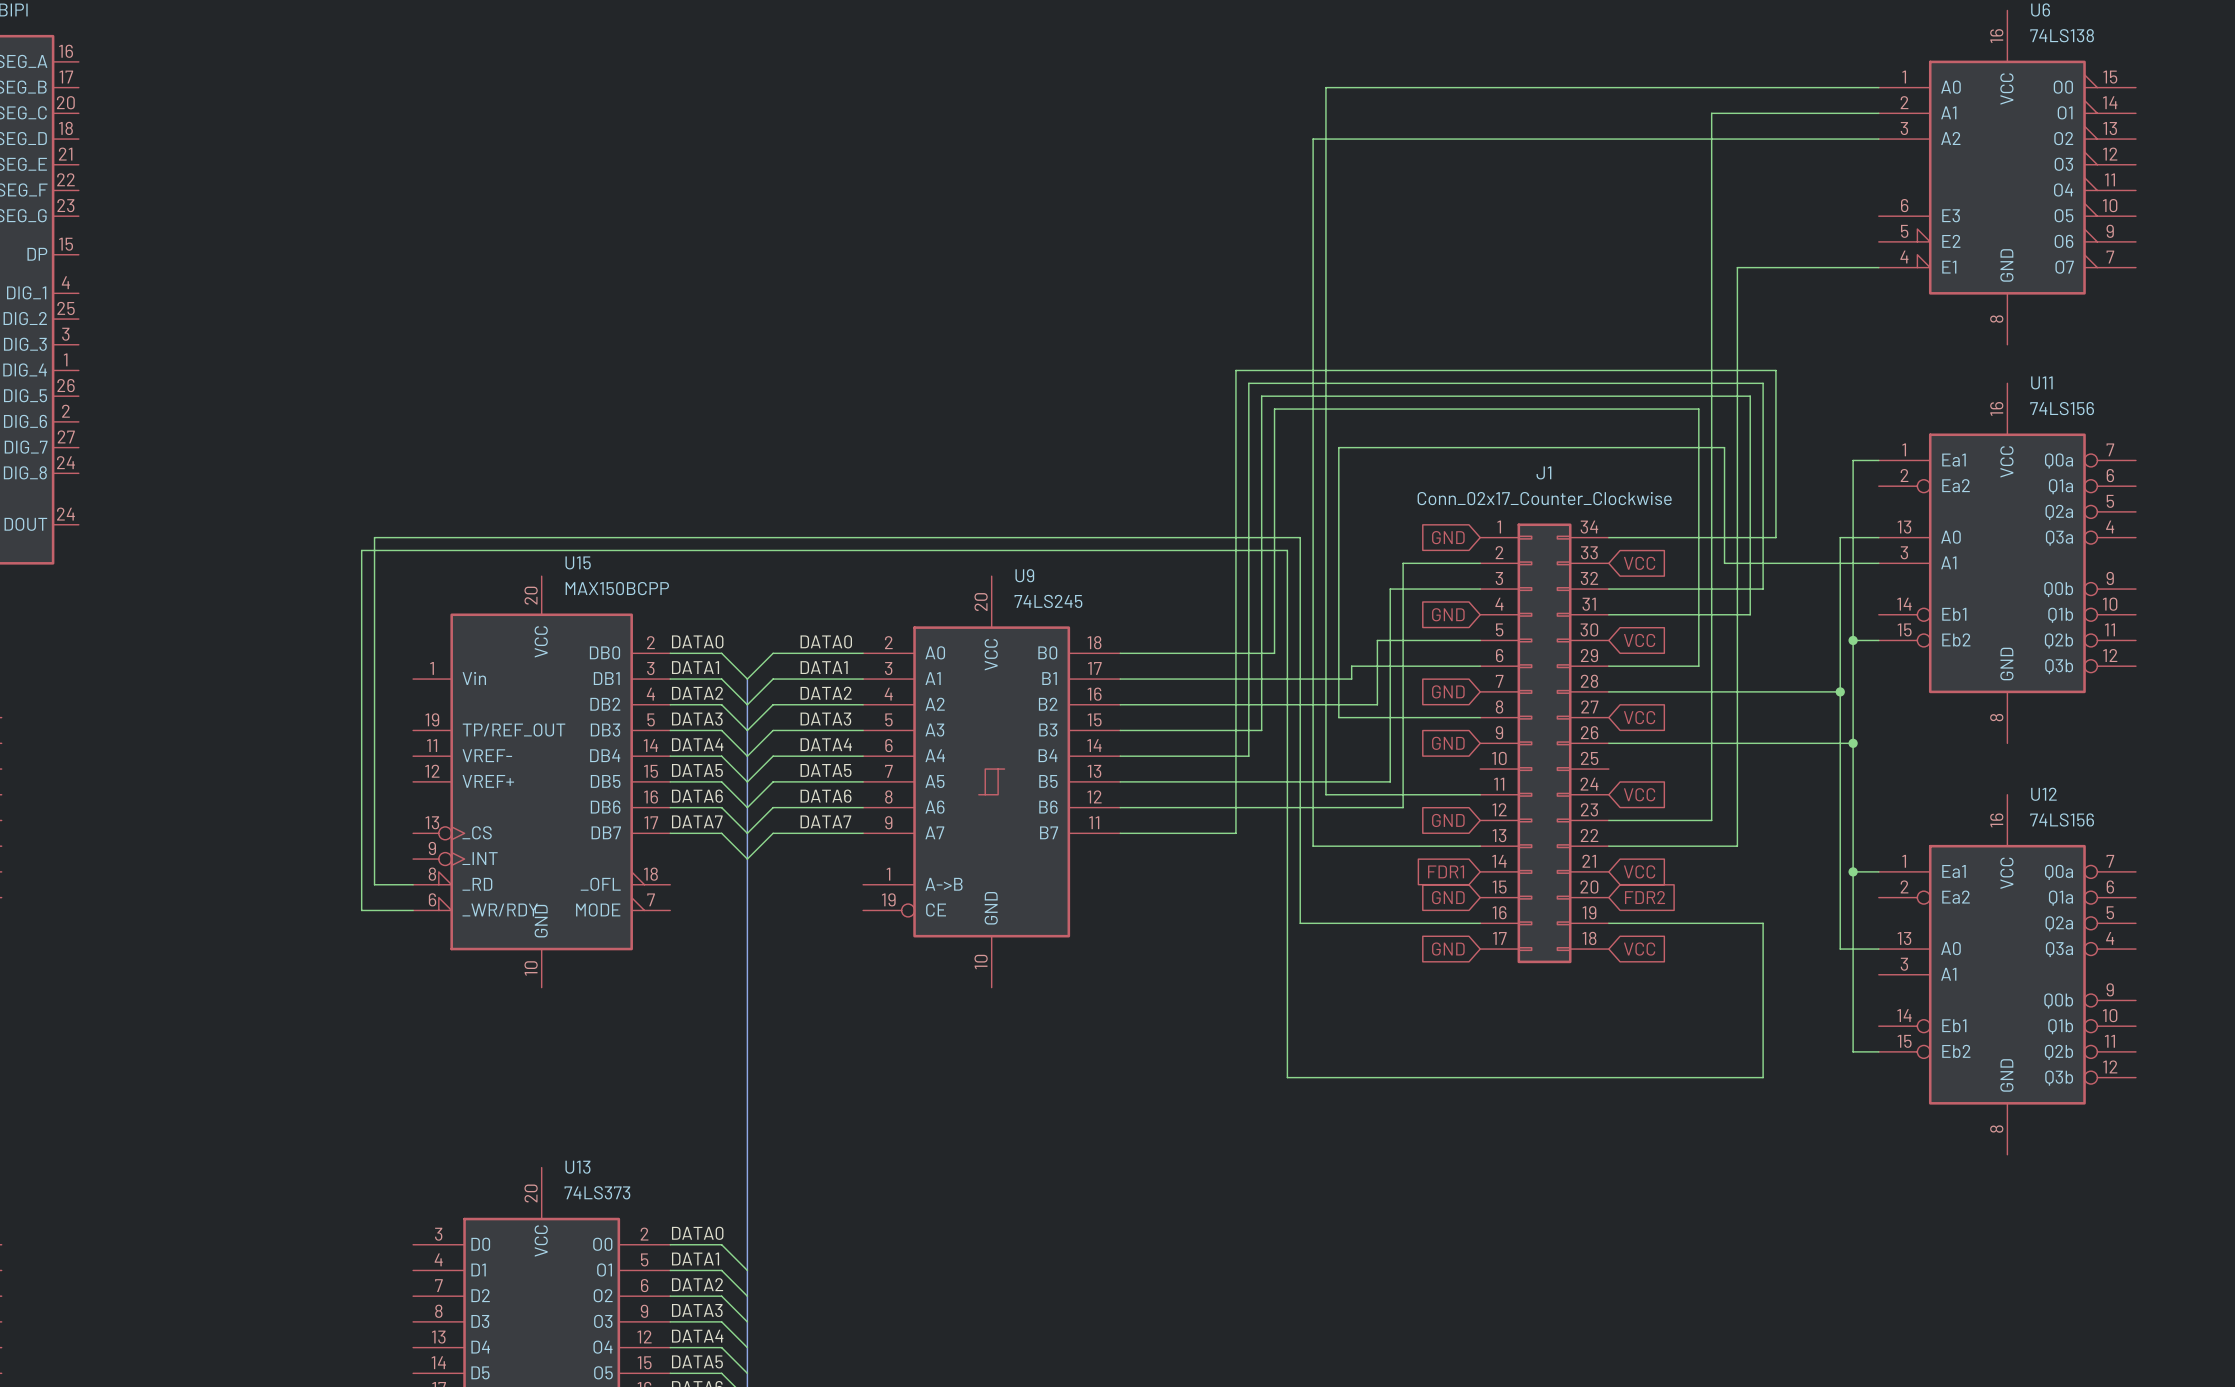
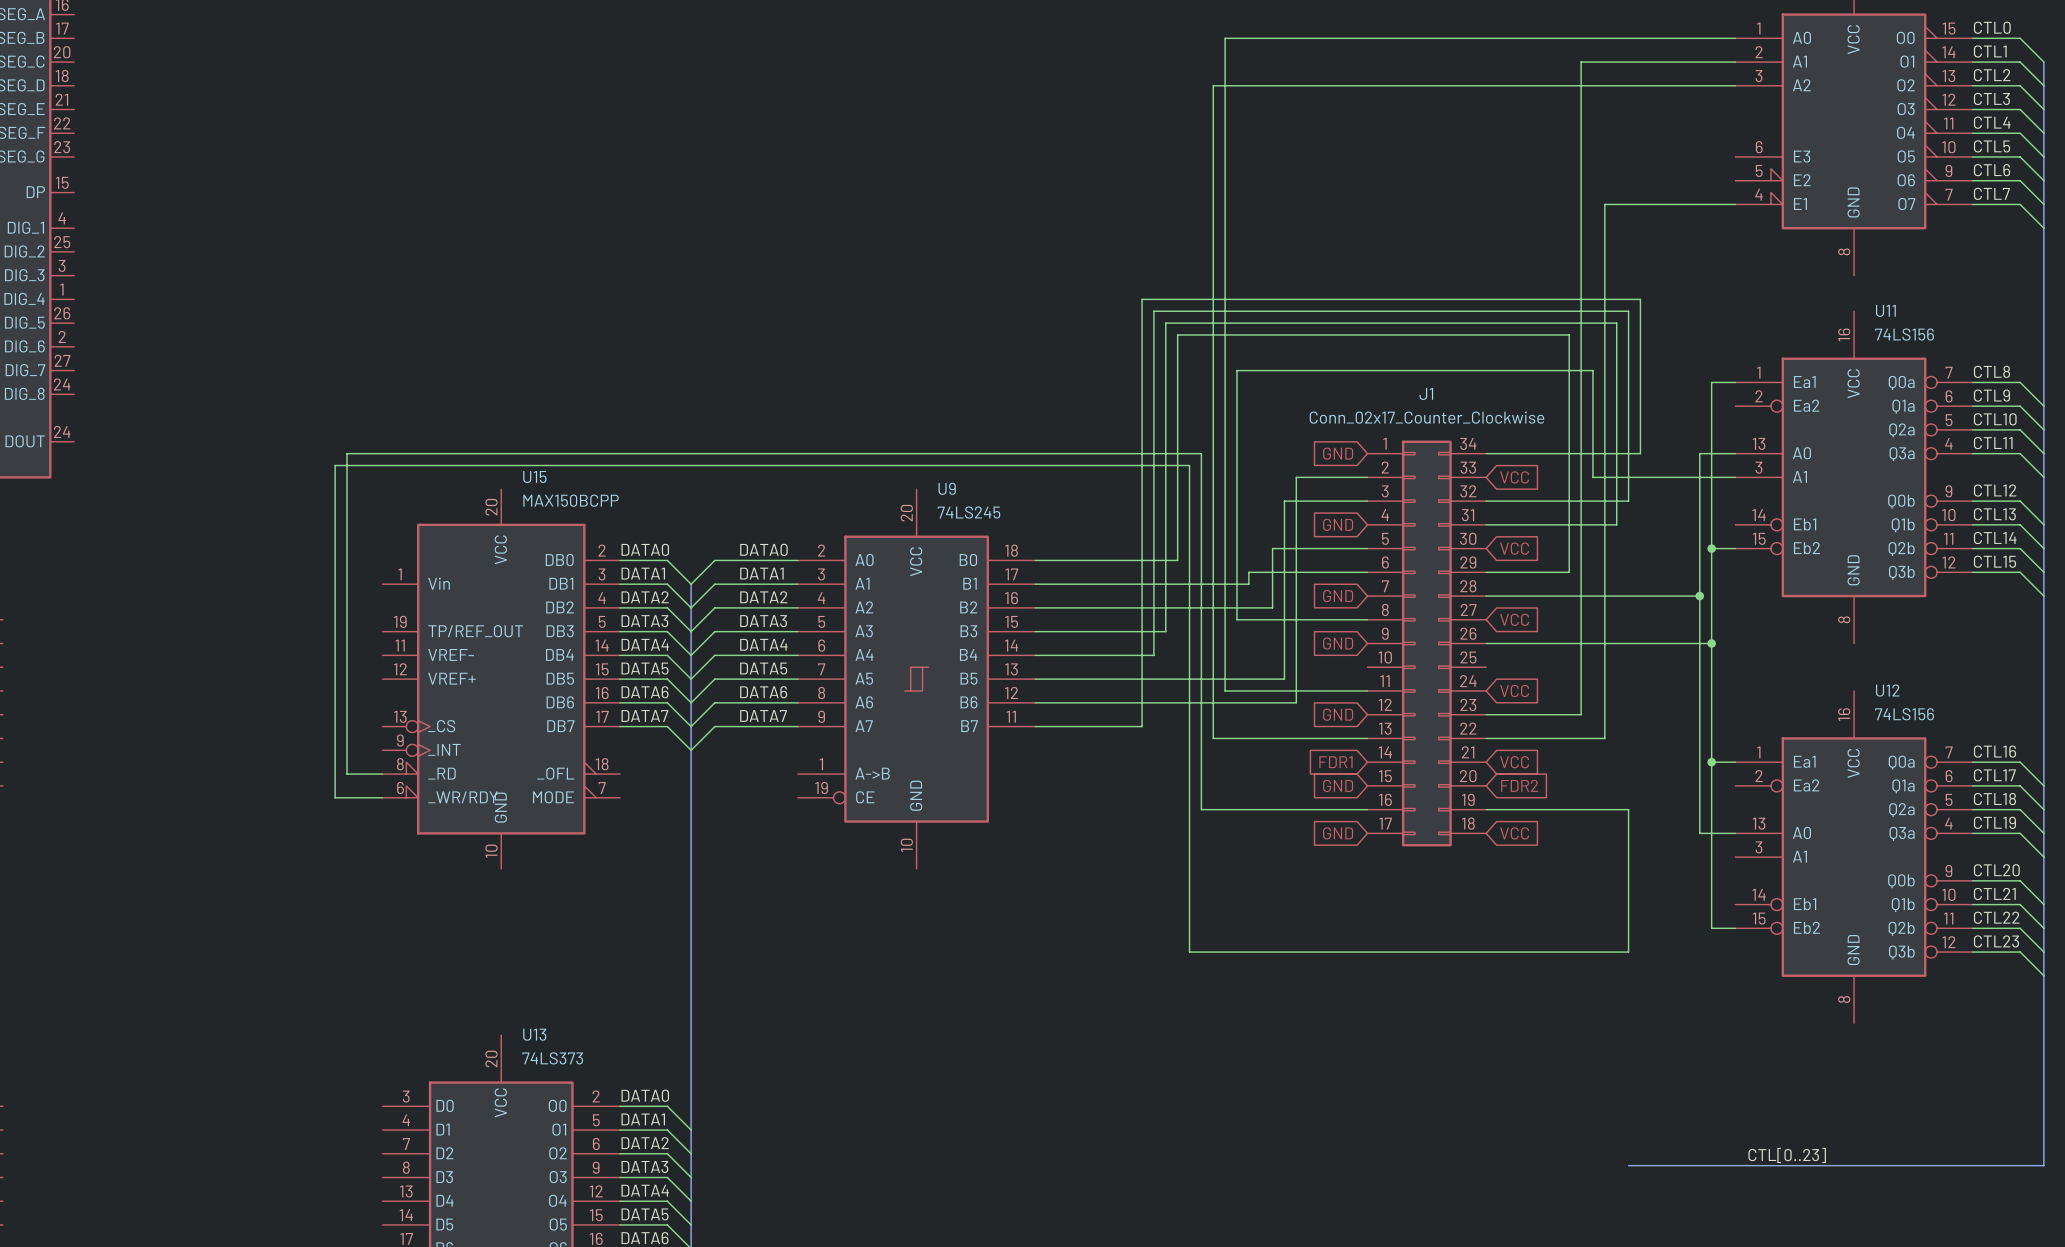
label: none -> CTL0 (1992, 27)
wire: none -> (1972, 38) (2020, 38) (2043, 62)
label: none -> CTL1 (1990, 51)
wire: none -> (1972, 62) (2020, 62) (2043, 85)
bus: none -> (2043, 62) (2043, 1165) (1628, 1165)
label: none -> CTL2 (1992, 75)
wire: none -> (1972, 85) (2020, 85) (2043, 109)
label: none -> CTL3 (1991, 98)
wire: none -> (1972, 109) (2020, 109) (2043, 133)
label: none -> CTL4 (1992, 122)
wire: none -> (1972, 133) (2020, 133) (2043, 156)
label: none -> CTL5 (1992, 146)
wire: none -> (1972, 156) (2020, 156) (2043, 180)
label: none -> CTL6 (1992, 170)
wire: none -> (1972, 180) (2020, 180) (2043, 204)
label: none -> CTL7 (1991, 193)
wire: none -> (1972, 204) (2020, 204) (2043, 228)
label: none -> CTL8 (1991, 371)
wire: none -> (1972, 382) (2020, 382) (2043, 406)
label: none -> CTL9 (1991, 395)
wire: none -> (1972, 406) (2020, 406) (2043, 429)
label: none -> CTL10 (1995, 419)
wire: none -> (1972, 429) (2020, 429) (2043, 453)
label: none -> CTL11 (1993, 443)
wire: none -> (1972, 453) (2020, 453) (2043, 477)
label: none -> CTL12 (1995, 490)
wire: none -> (1972, 501) (2020, 501) (2043, 524)
label: none -> CTL13 (1994, 514)
wire: none -> (1972, 524) (2020, 524) (2043, 548)
label: none -> CTL14 (1995, 538)
wire: none -> (1972, 548) (2020, 548) (2043, 572)
label: none -> CTL15 (1994, 561)
wire: none -> (1972, 572) (2020, 572) (2043, 596)
label: none -> CTL16 (1995, 751)
wire: none -> (1972, 762) (2020, 762) (2043, 785)
label: none -> CTL17 (1994, 775)
wire: none -> (1972, 785) (2020, 785) (2043, 809)
label: none -> CTL18 (1994, 799)
wire: none -> (1972, 809) (2020, 809) (2043, 833)
label: none -> CTL19 (1994, 822)
wire: none -> (1972, 833) (2020, 833) (2043, 857)
label: none -> CTL20 (1996, 870)
wire: none -> (1972, 880) (2020, 880) (2043, 904)
label: none -> CTL21 (1994, 893)
wire: none -> (1972, 904) (2020, 904) (2043, 928)
label: none -> CTL22 (1996, 917)
wire: none -> (1972, 928) (2020, 928) (2043, 952)
label: none -> CTL23 (1996, 941)
wire: none -> (1972, 952) (2020, 952) (2043, 975)
label: none -> CTL[0..23] (1787, 1155)

